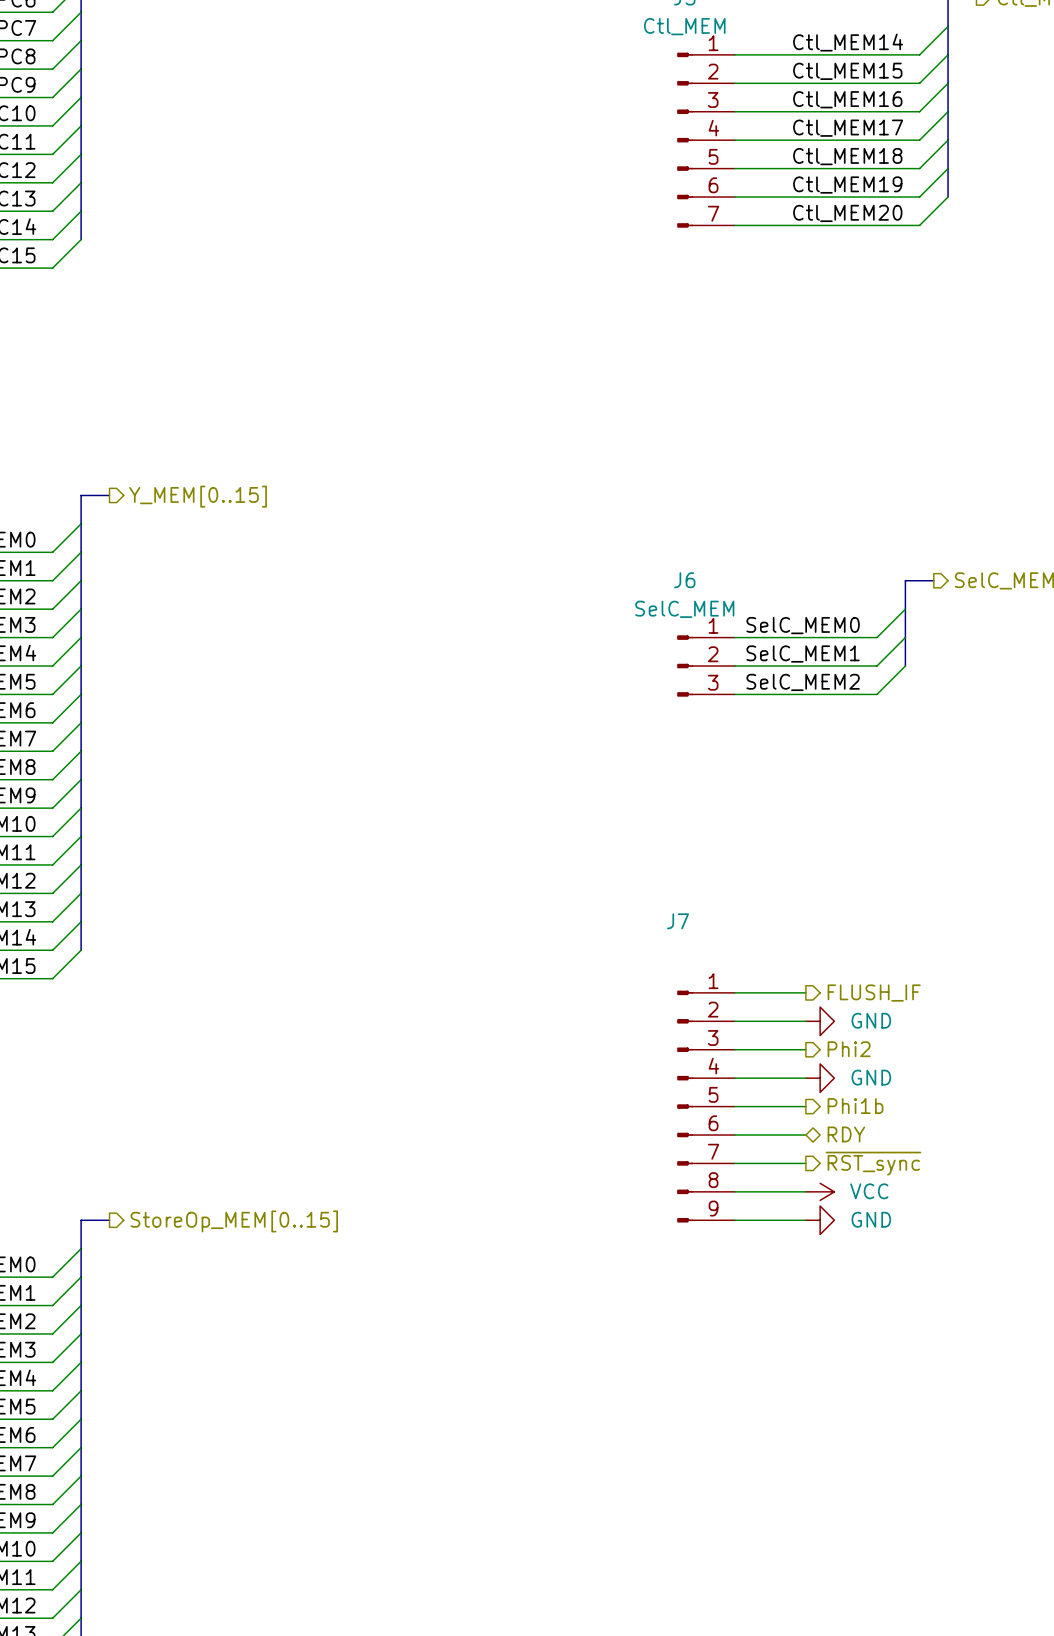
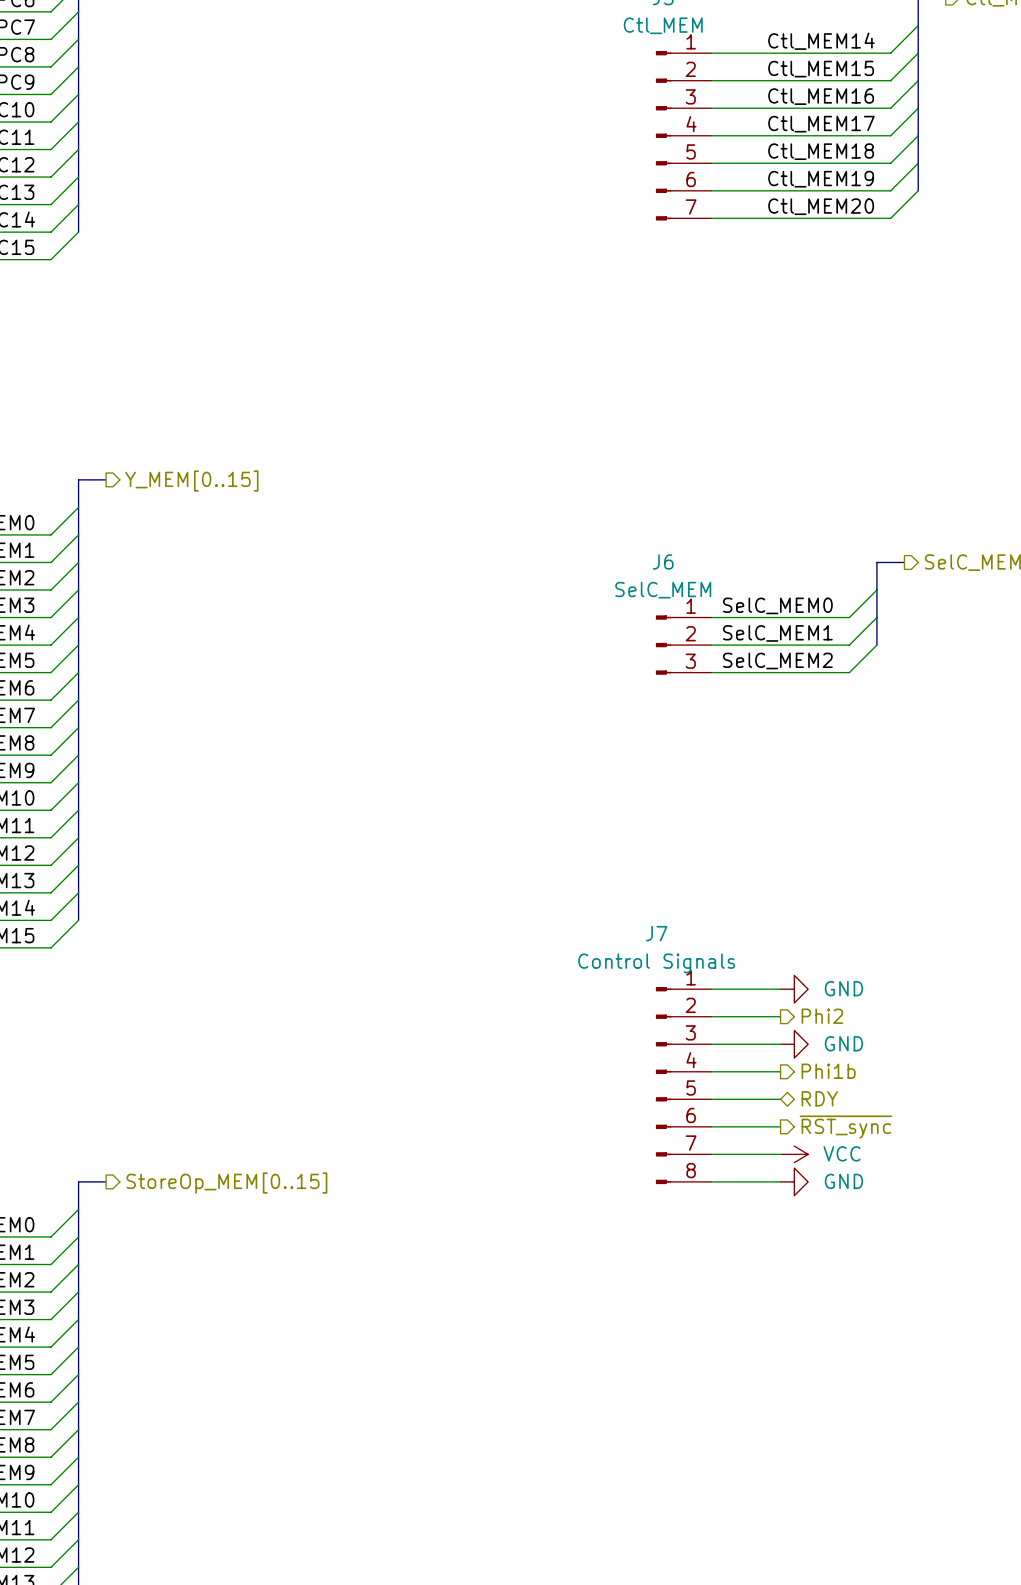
J7 name position: J7 (678, 921) -> J7 (656, 933)
J7 symbol: [677, 990, 735, 1223] -> [655, 986, 712, 1185]
wire: (734, 992) (805, 992) -> none
hierarchical label: FLUSH_IF (874, 993) -> none
J7 value: none -> Control Signals (656, 963)

